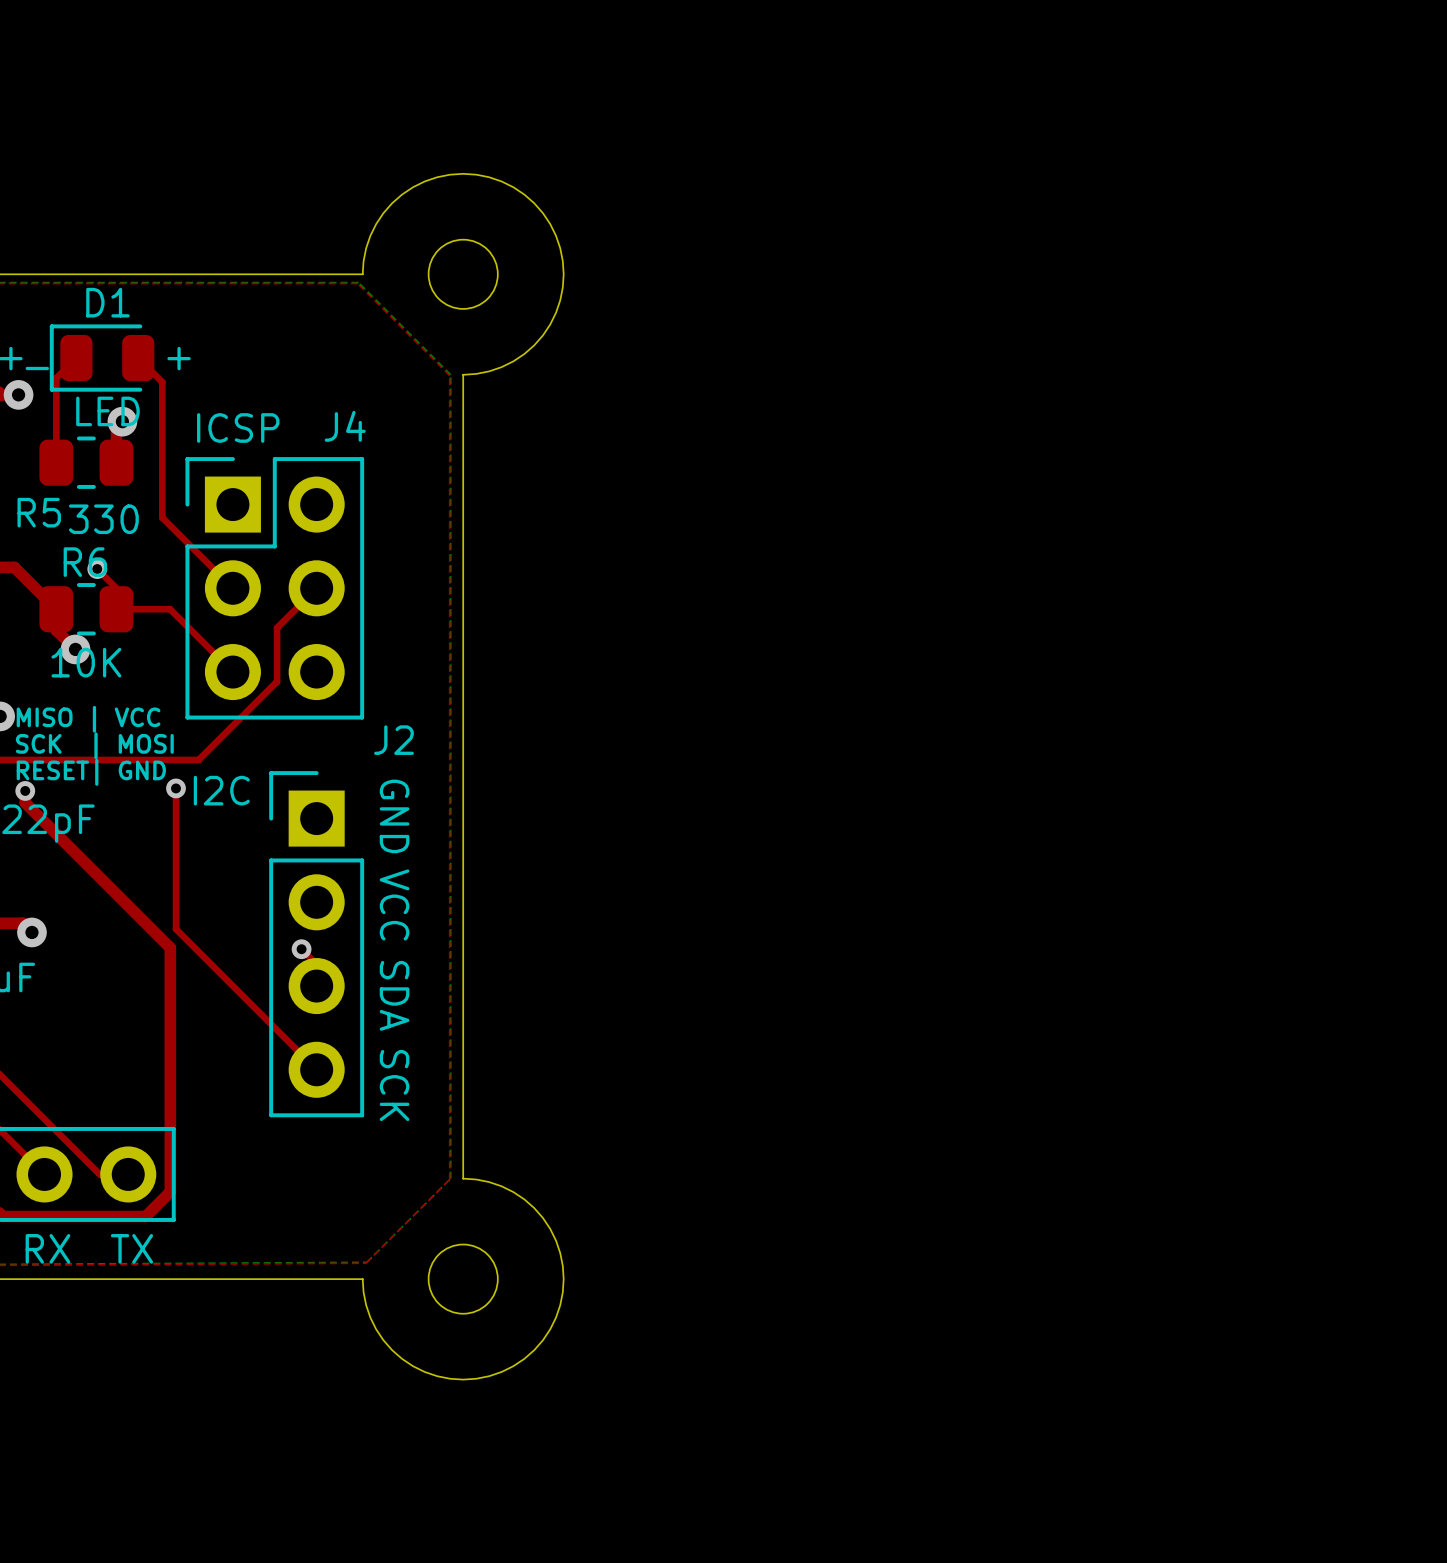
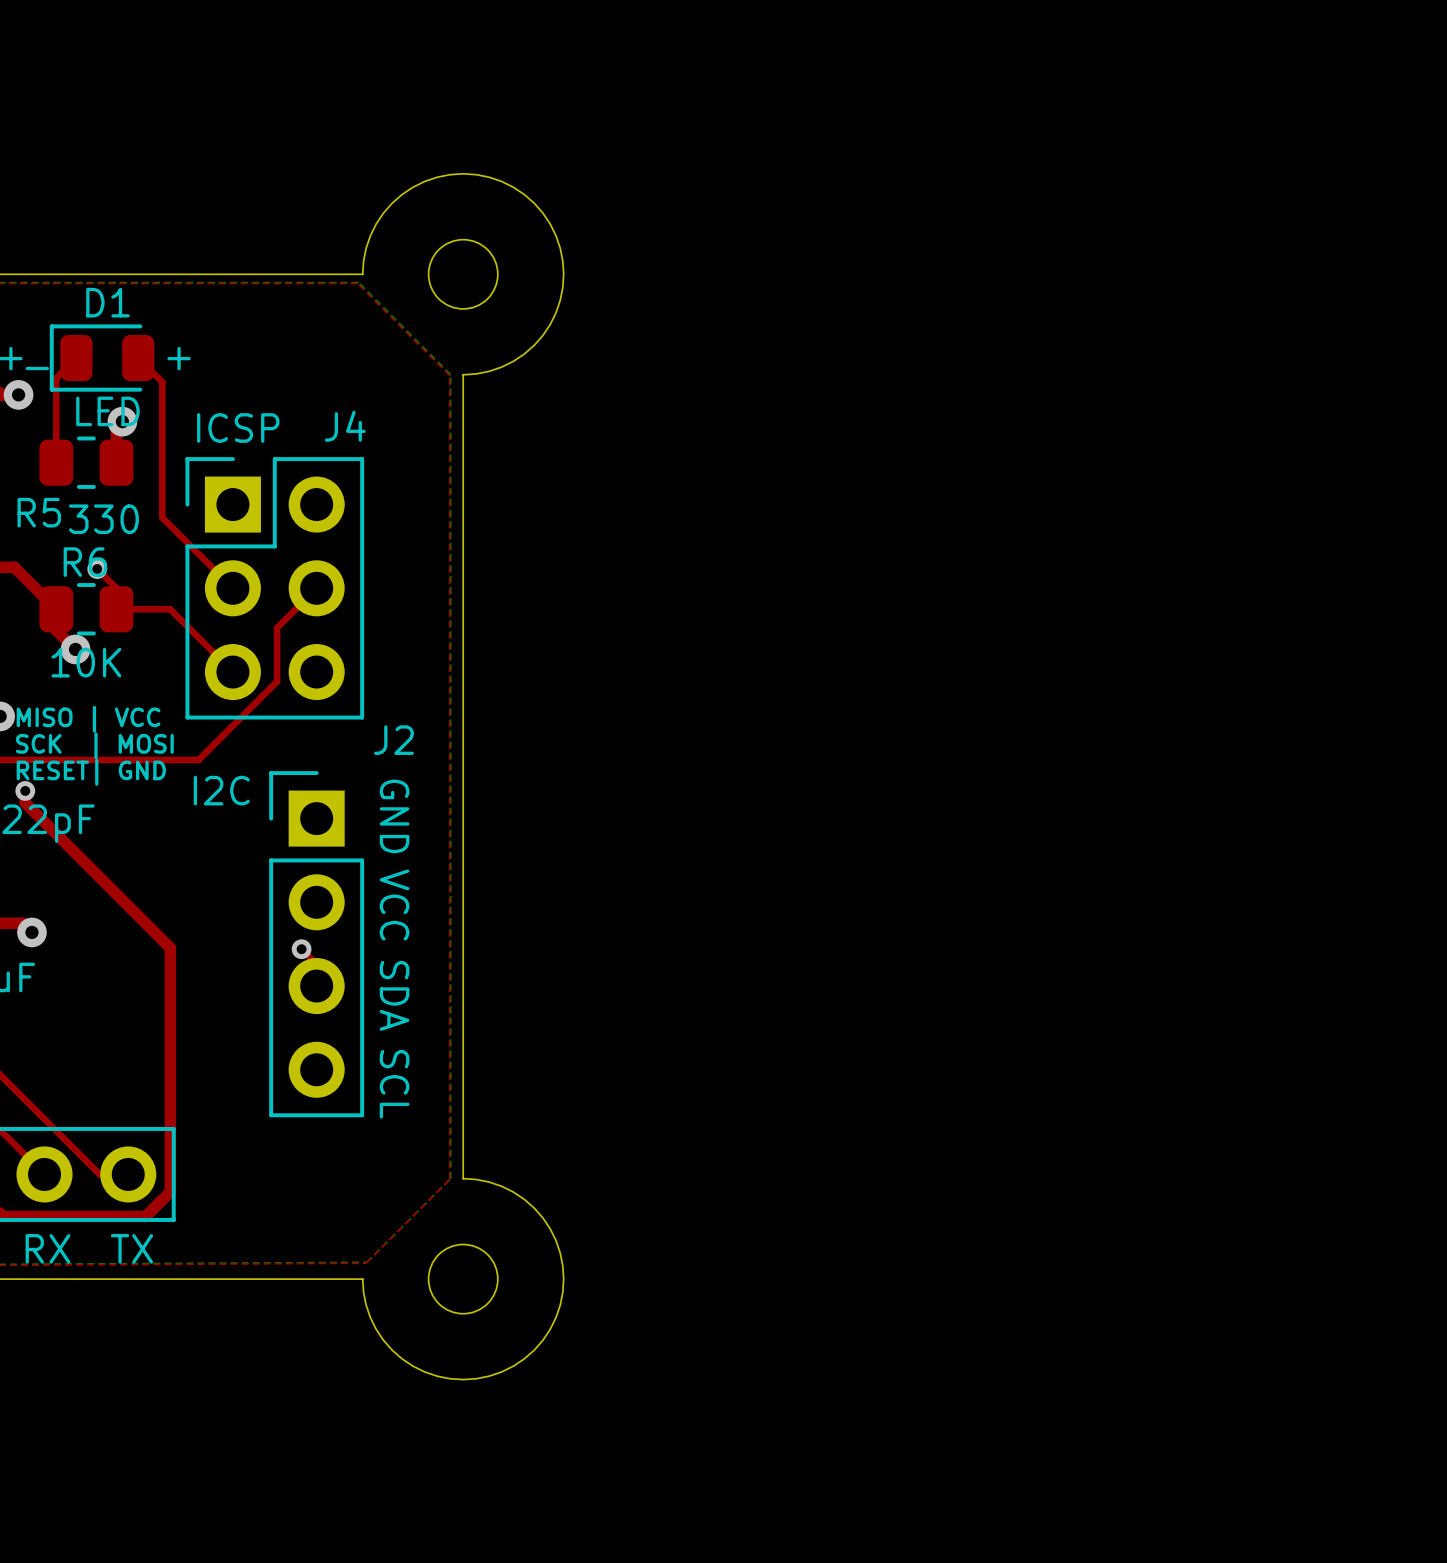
top track: (175, 788) (175, 929) (316, 1069) -> none
via: (175, 788) -> none
text: SCK (394, 1085) -> SCL (394, 1084)

